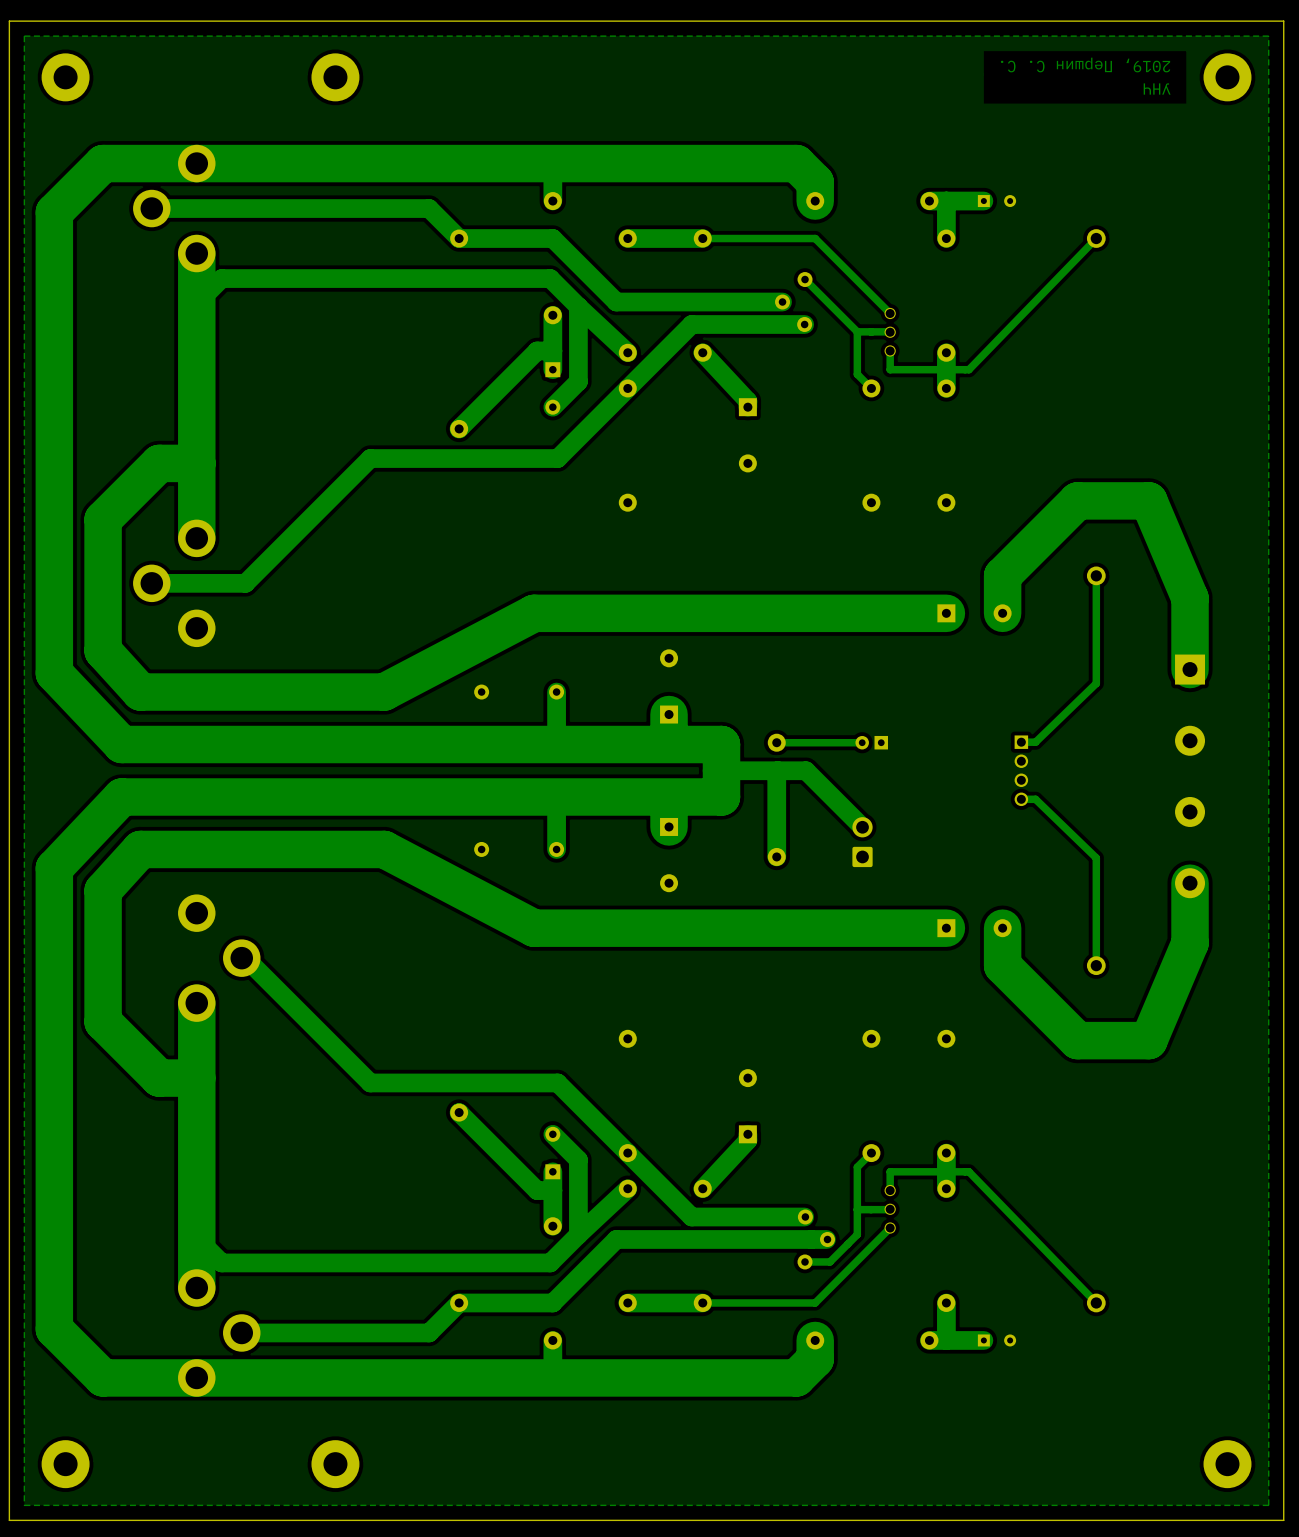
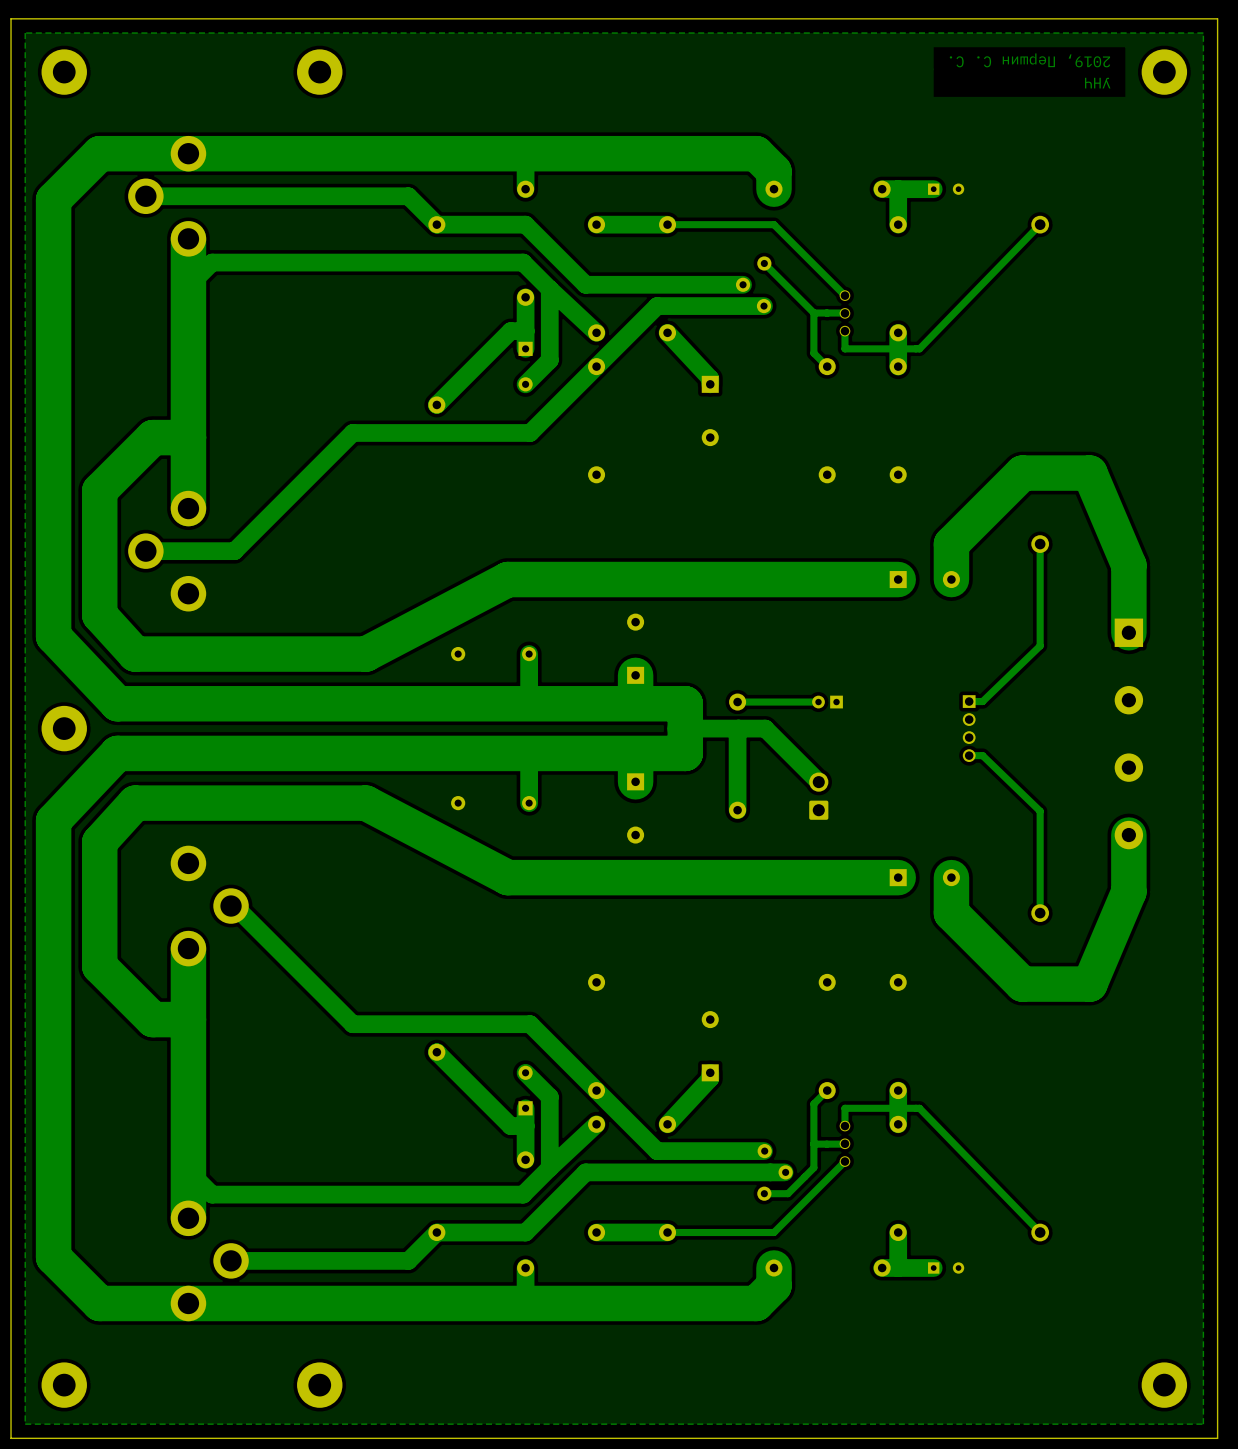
part: none -> (64, 728)

